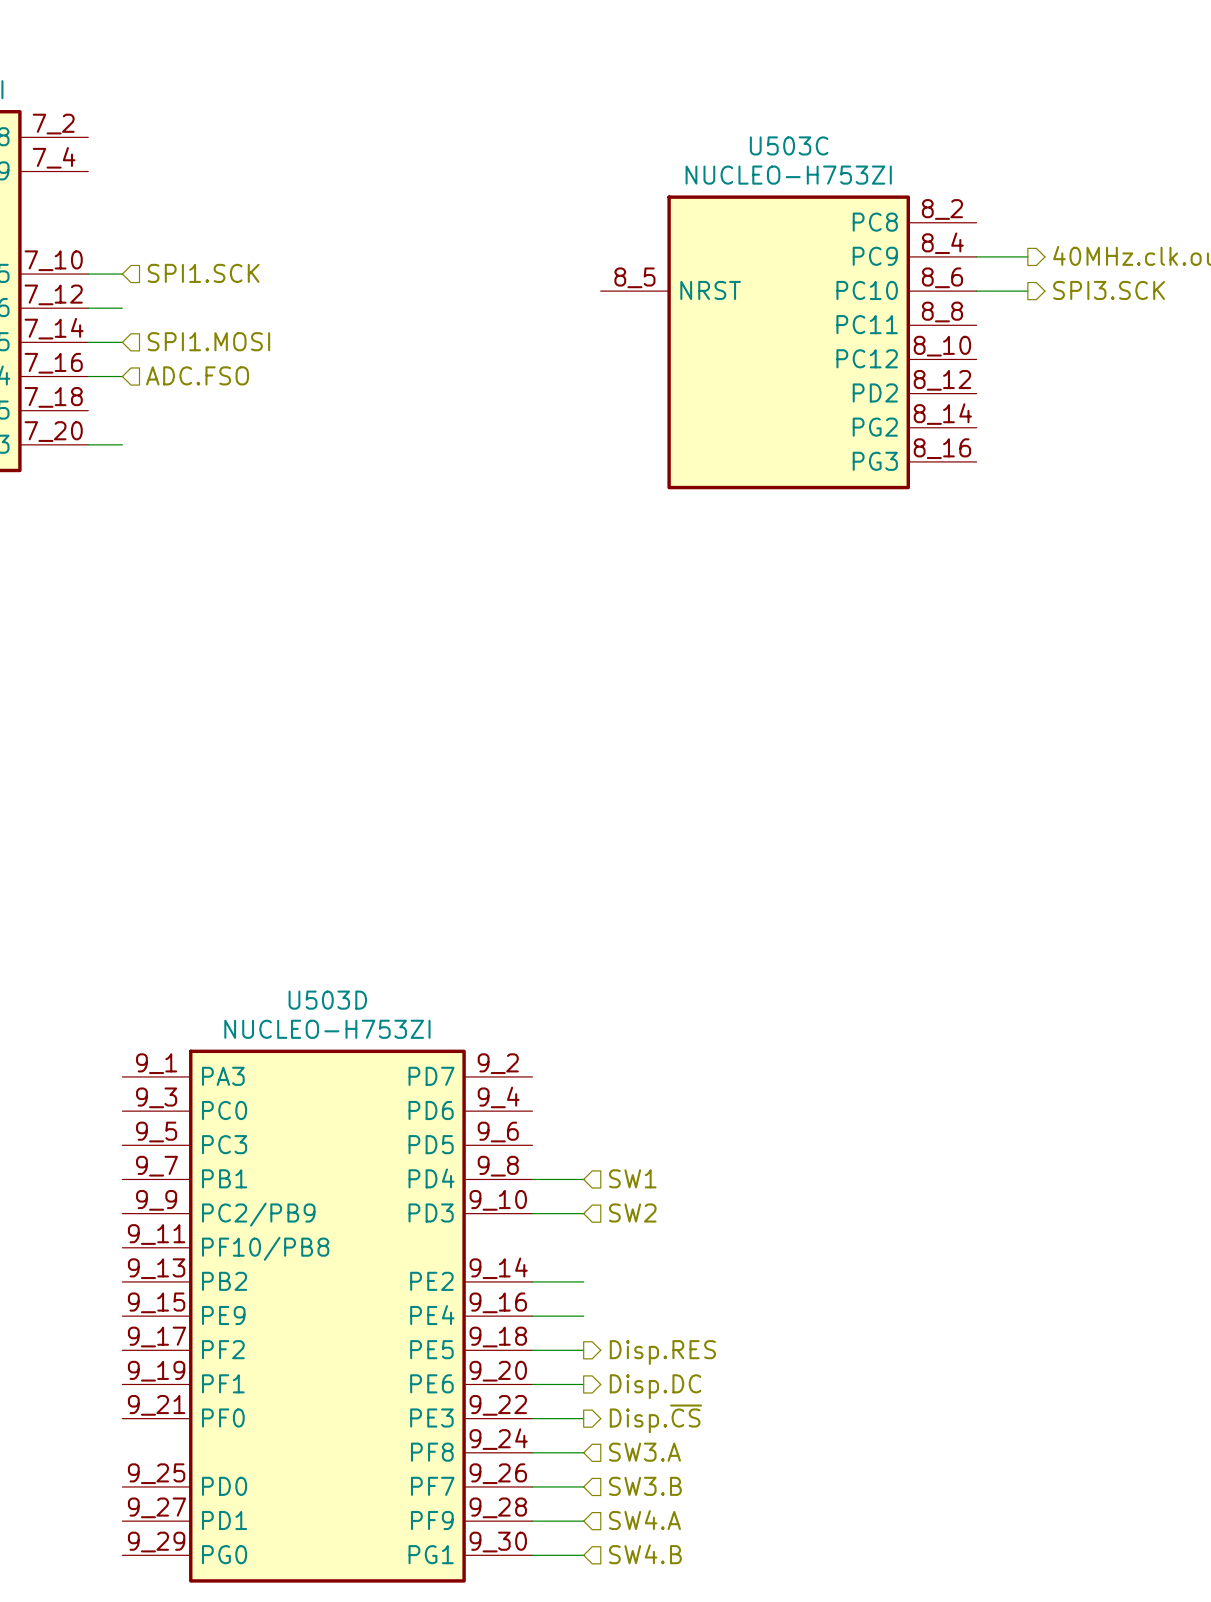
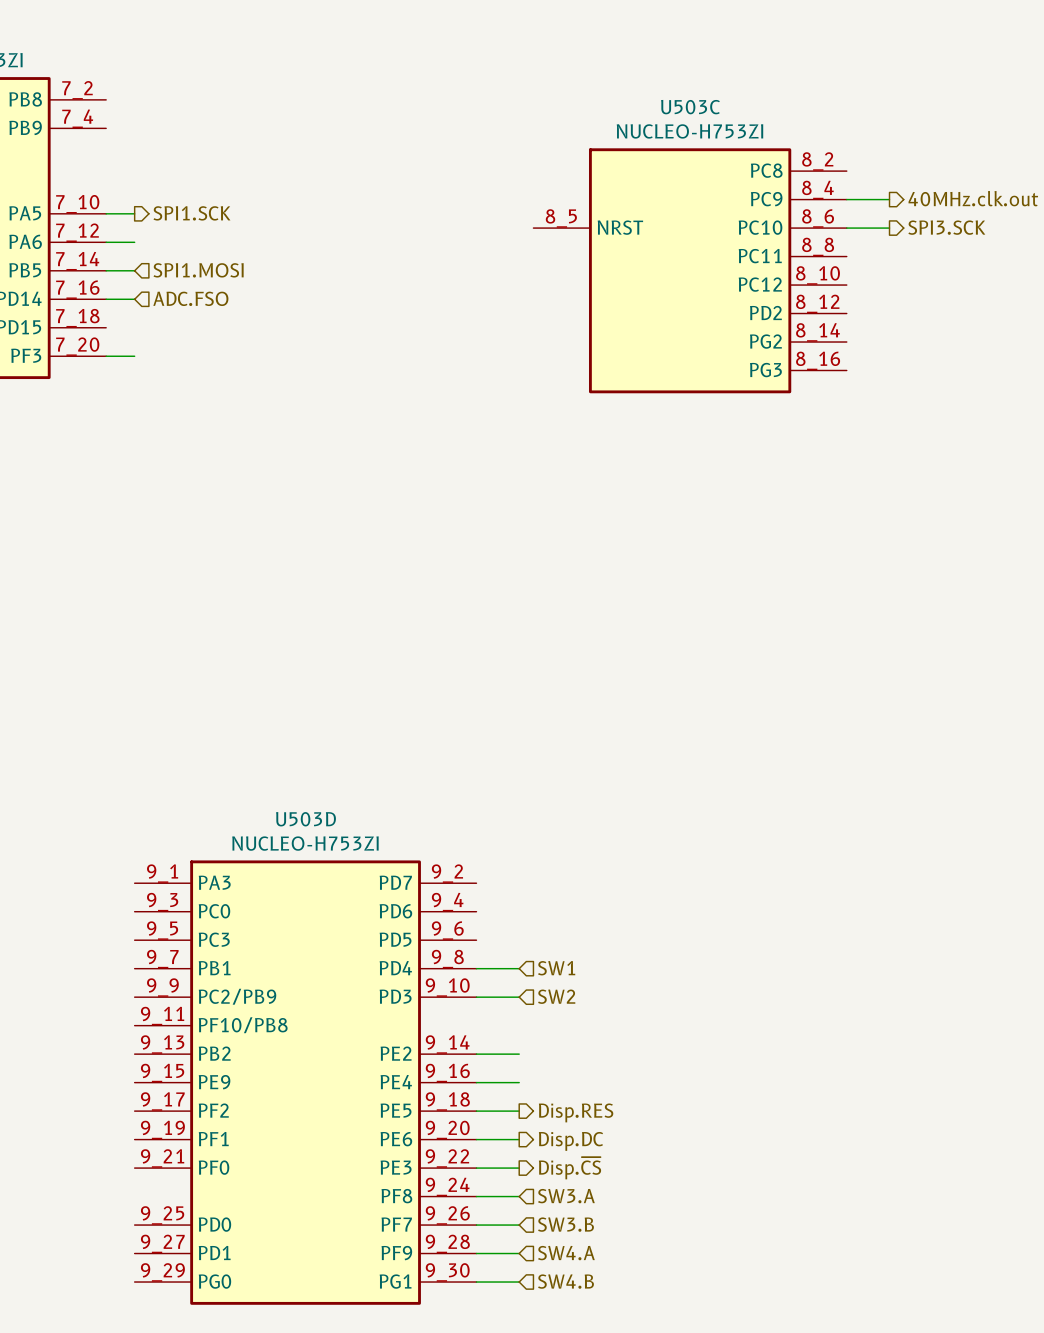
hierarchical label shape: input (203, 273) -> output (191, 213)

